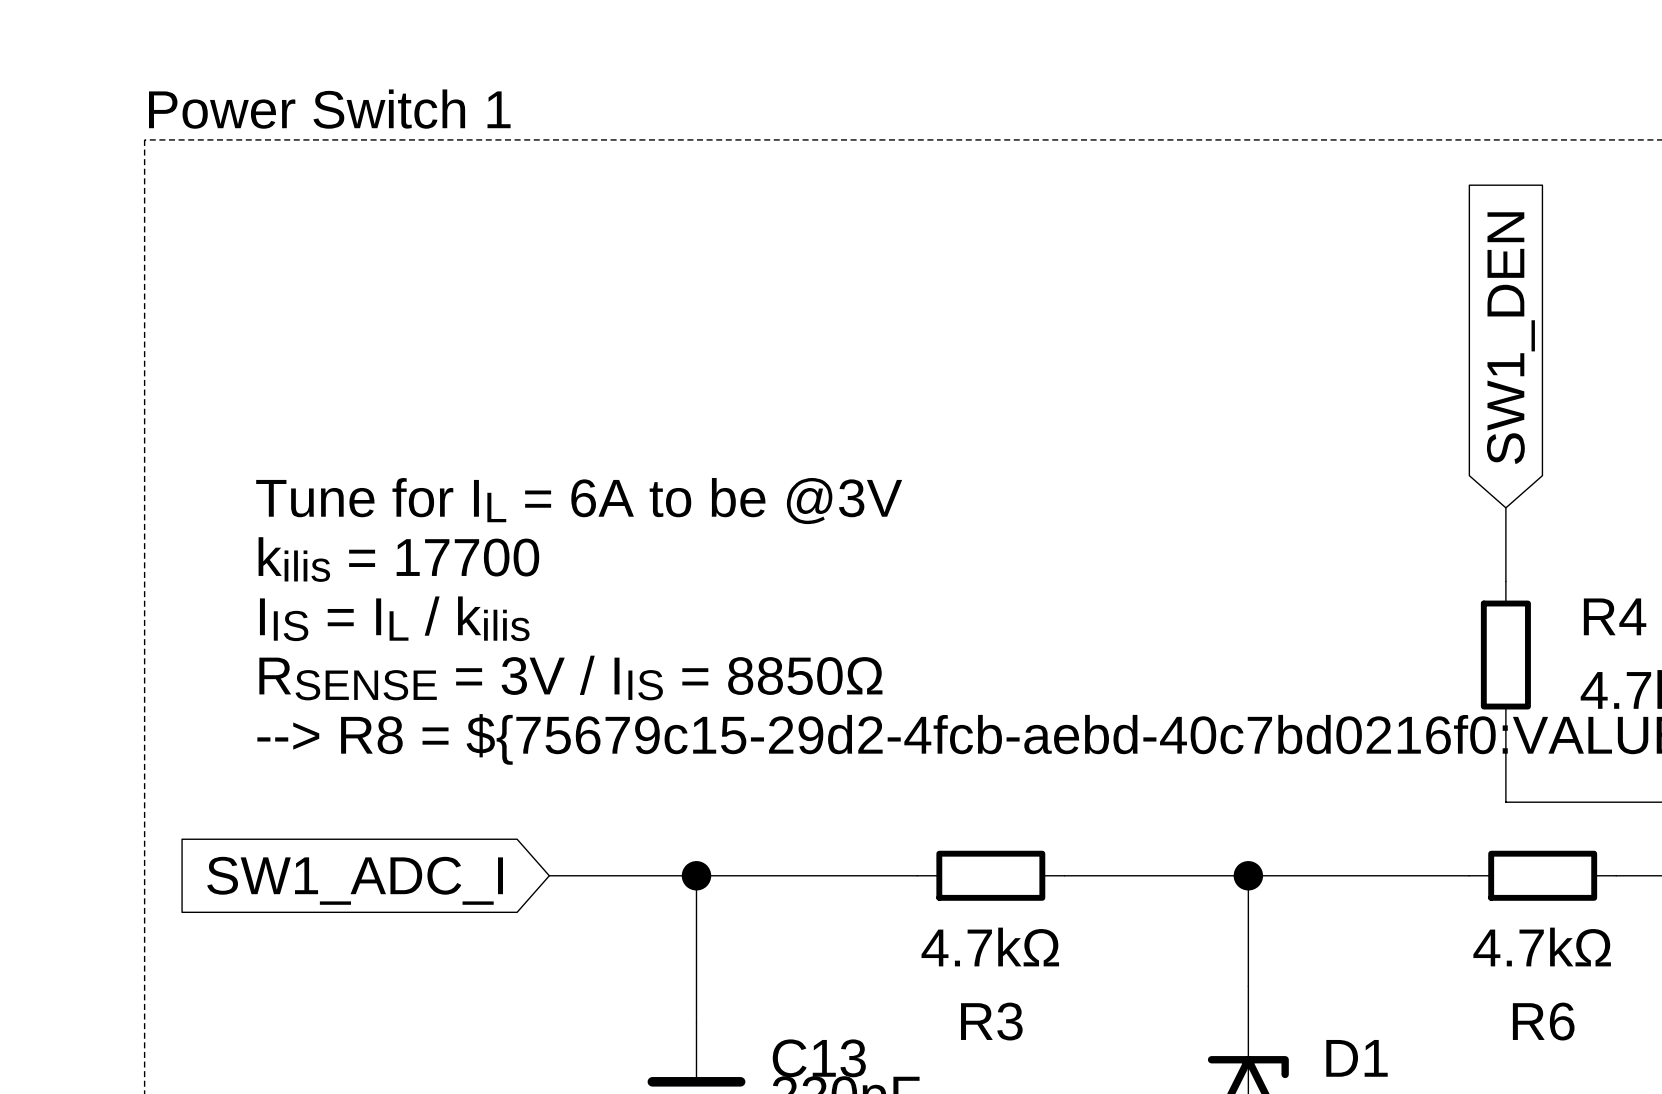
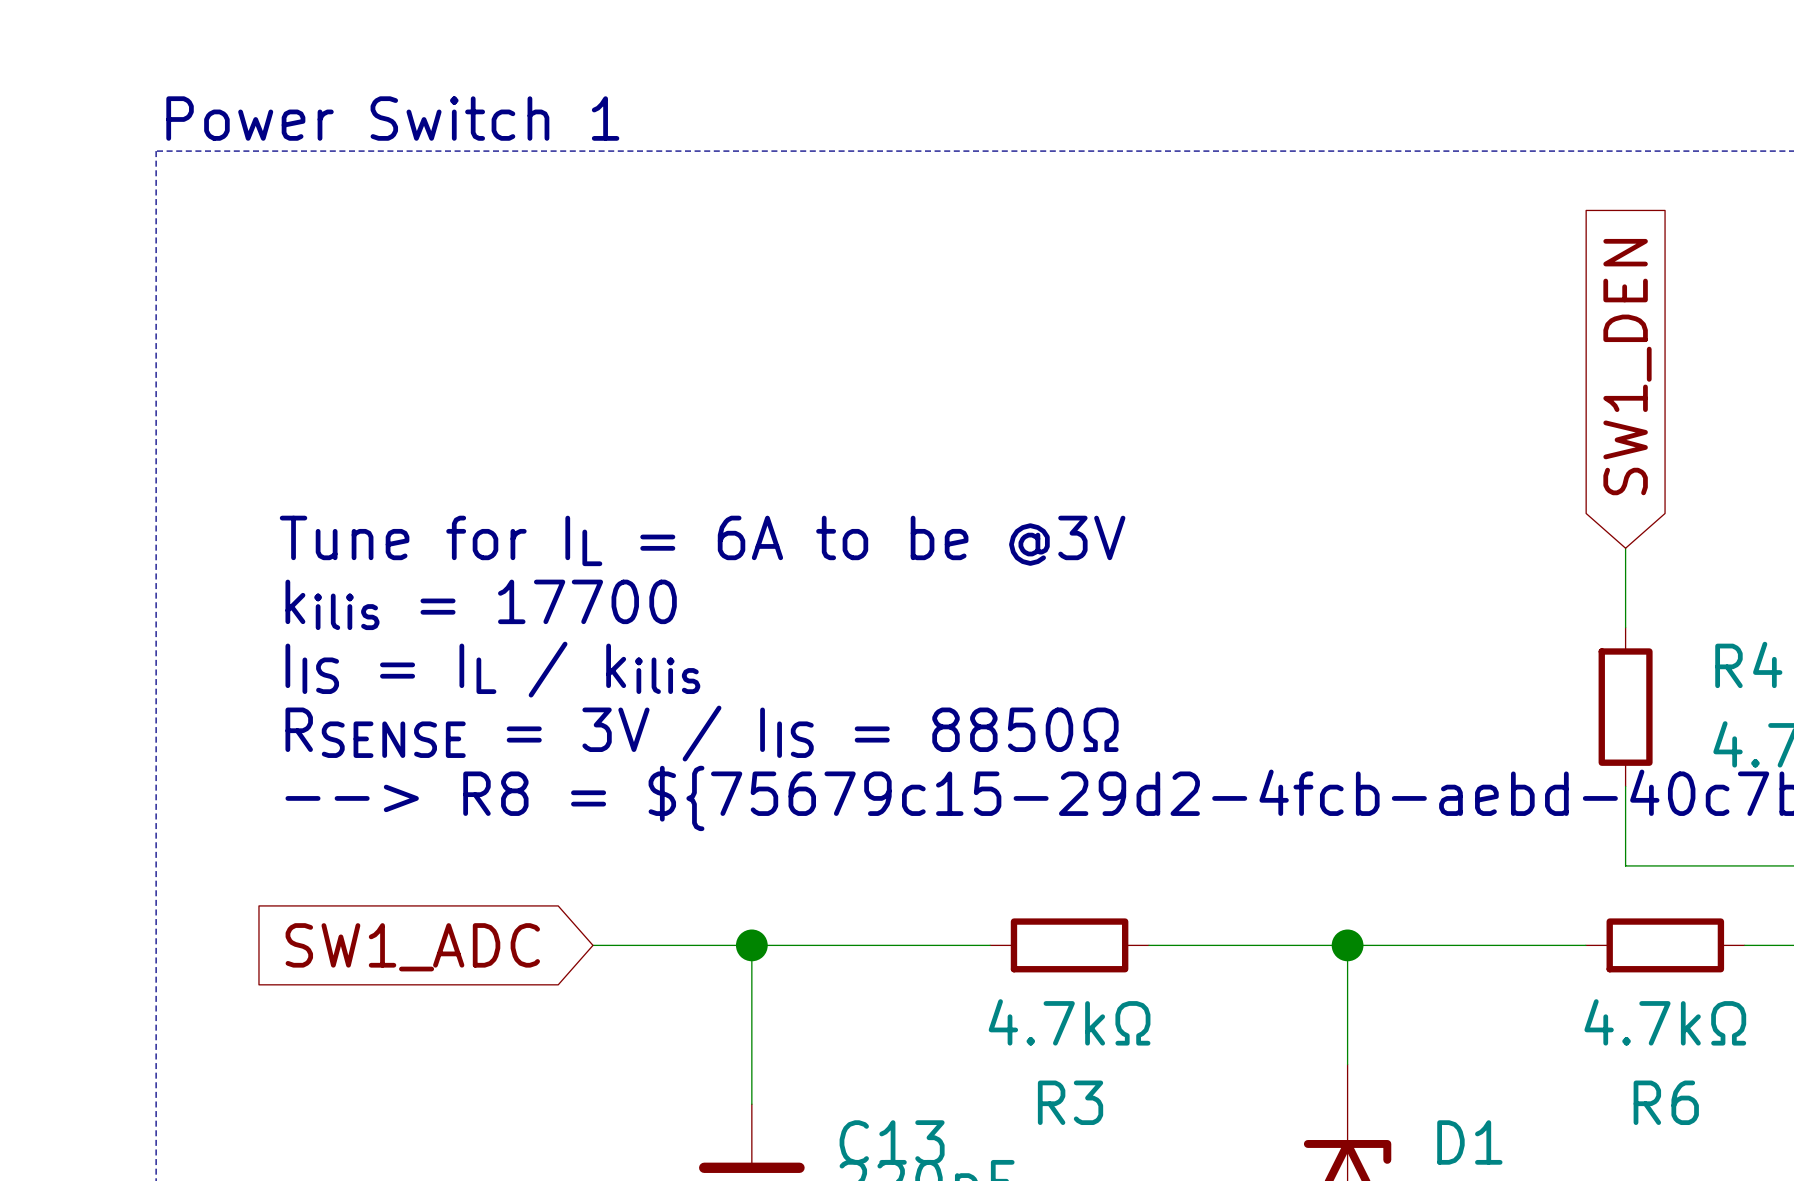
global label: SW1_ADC_I (355, 880) -> SW1_ADC (412, 947)

